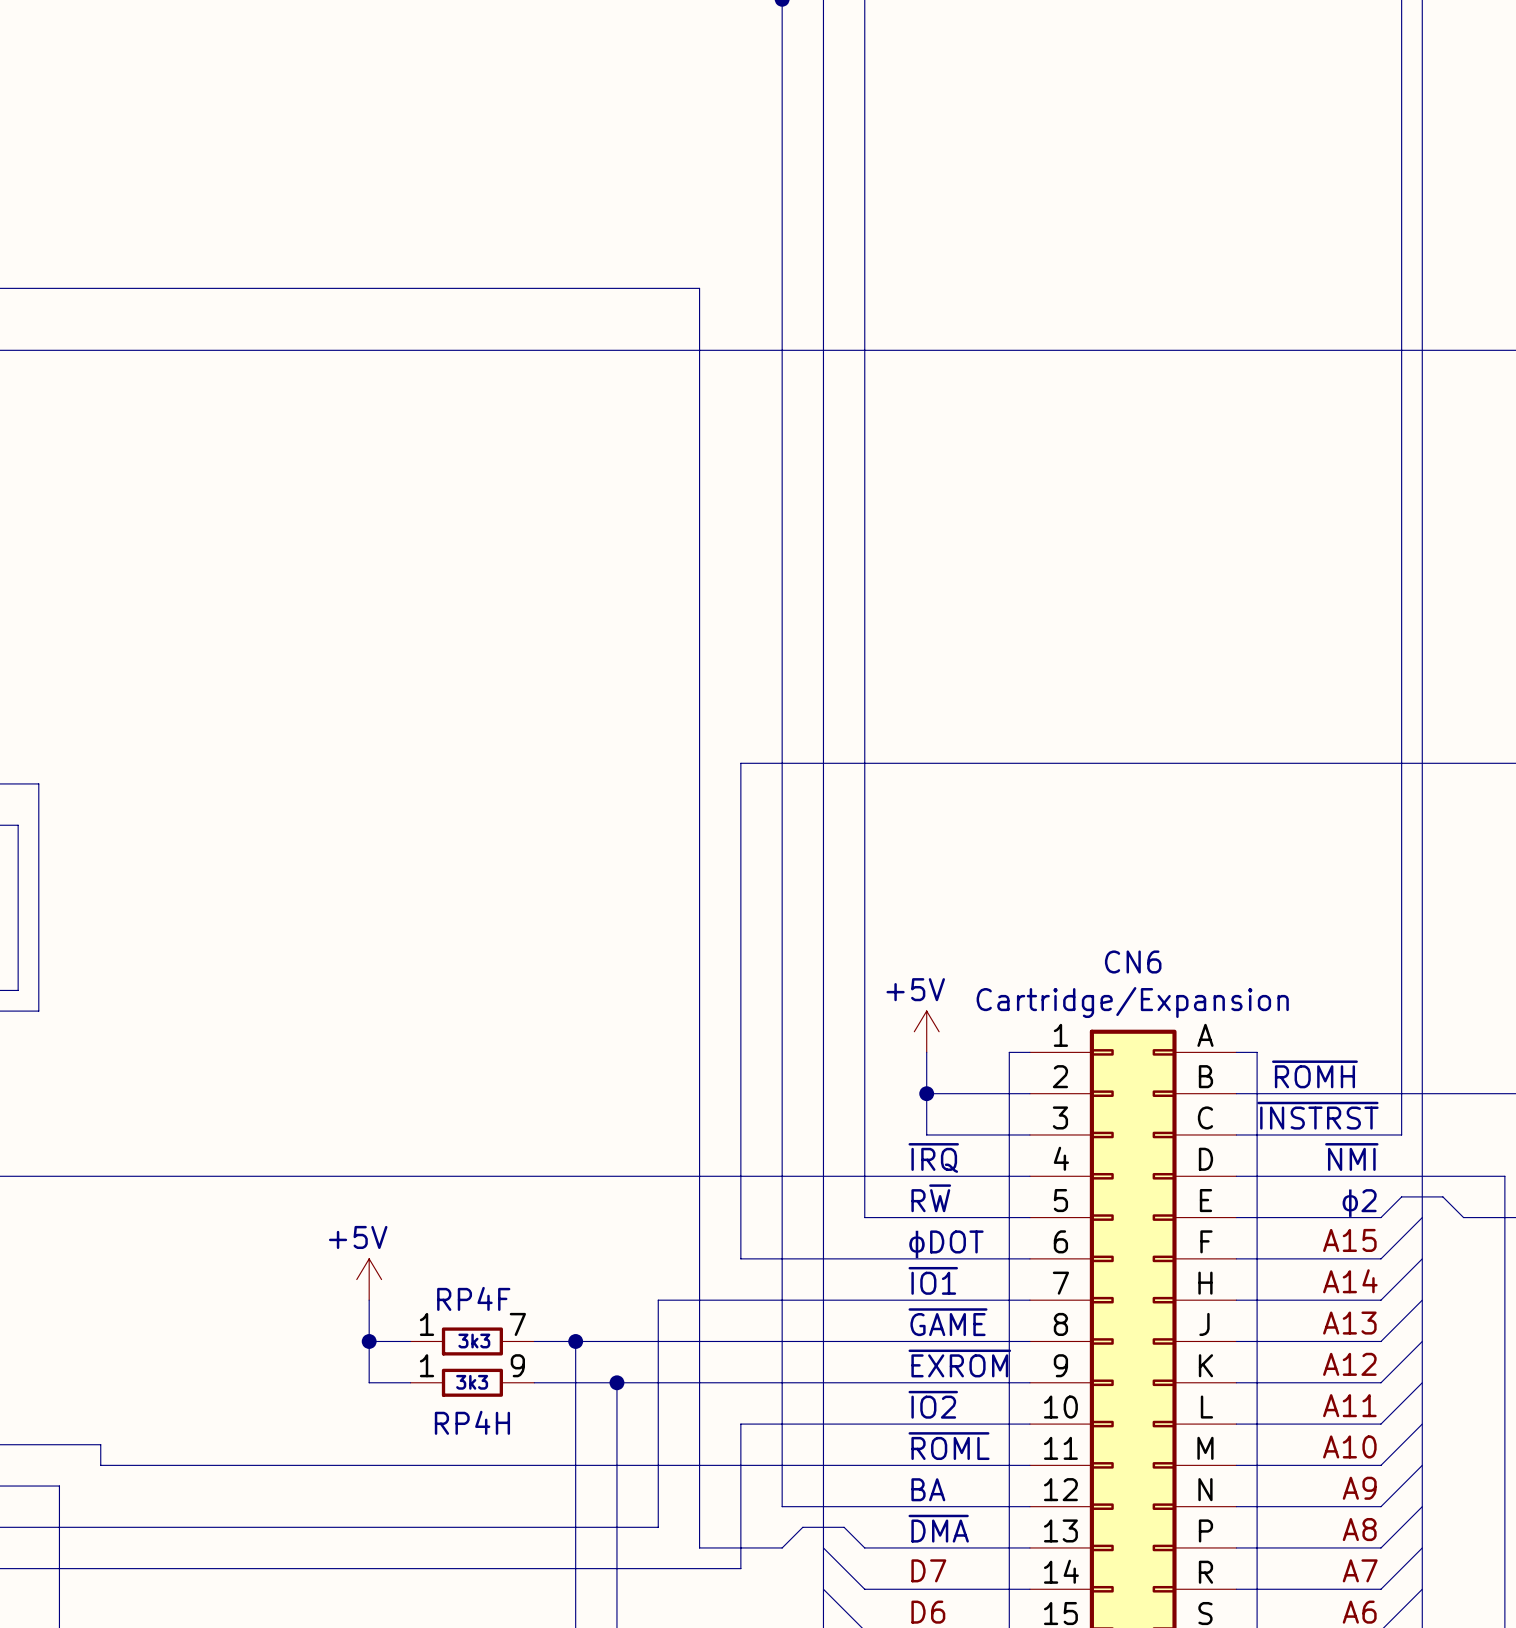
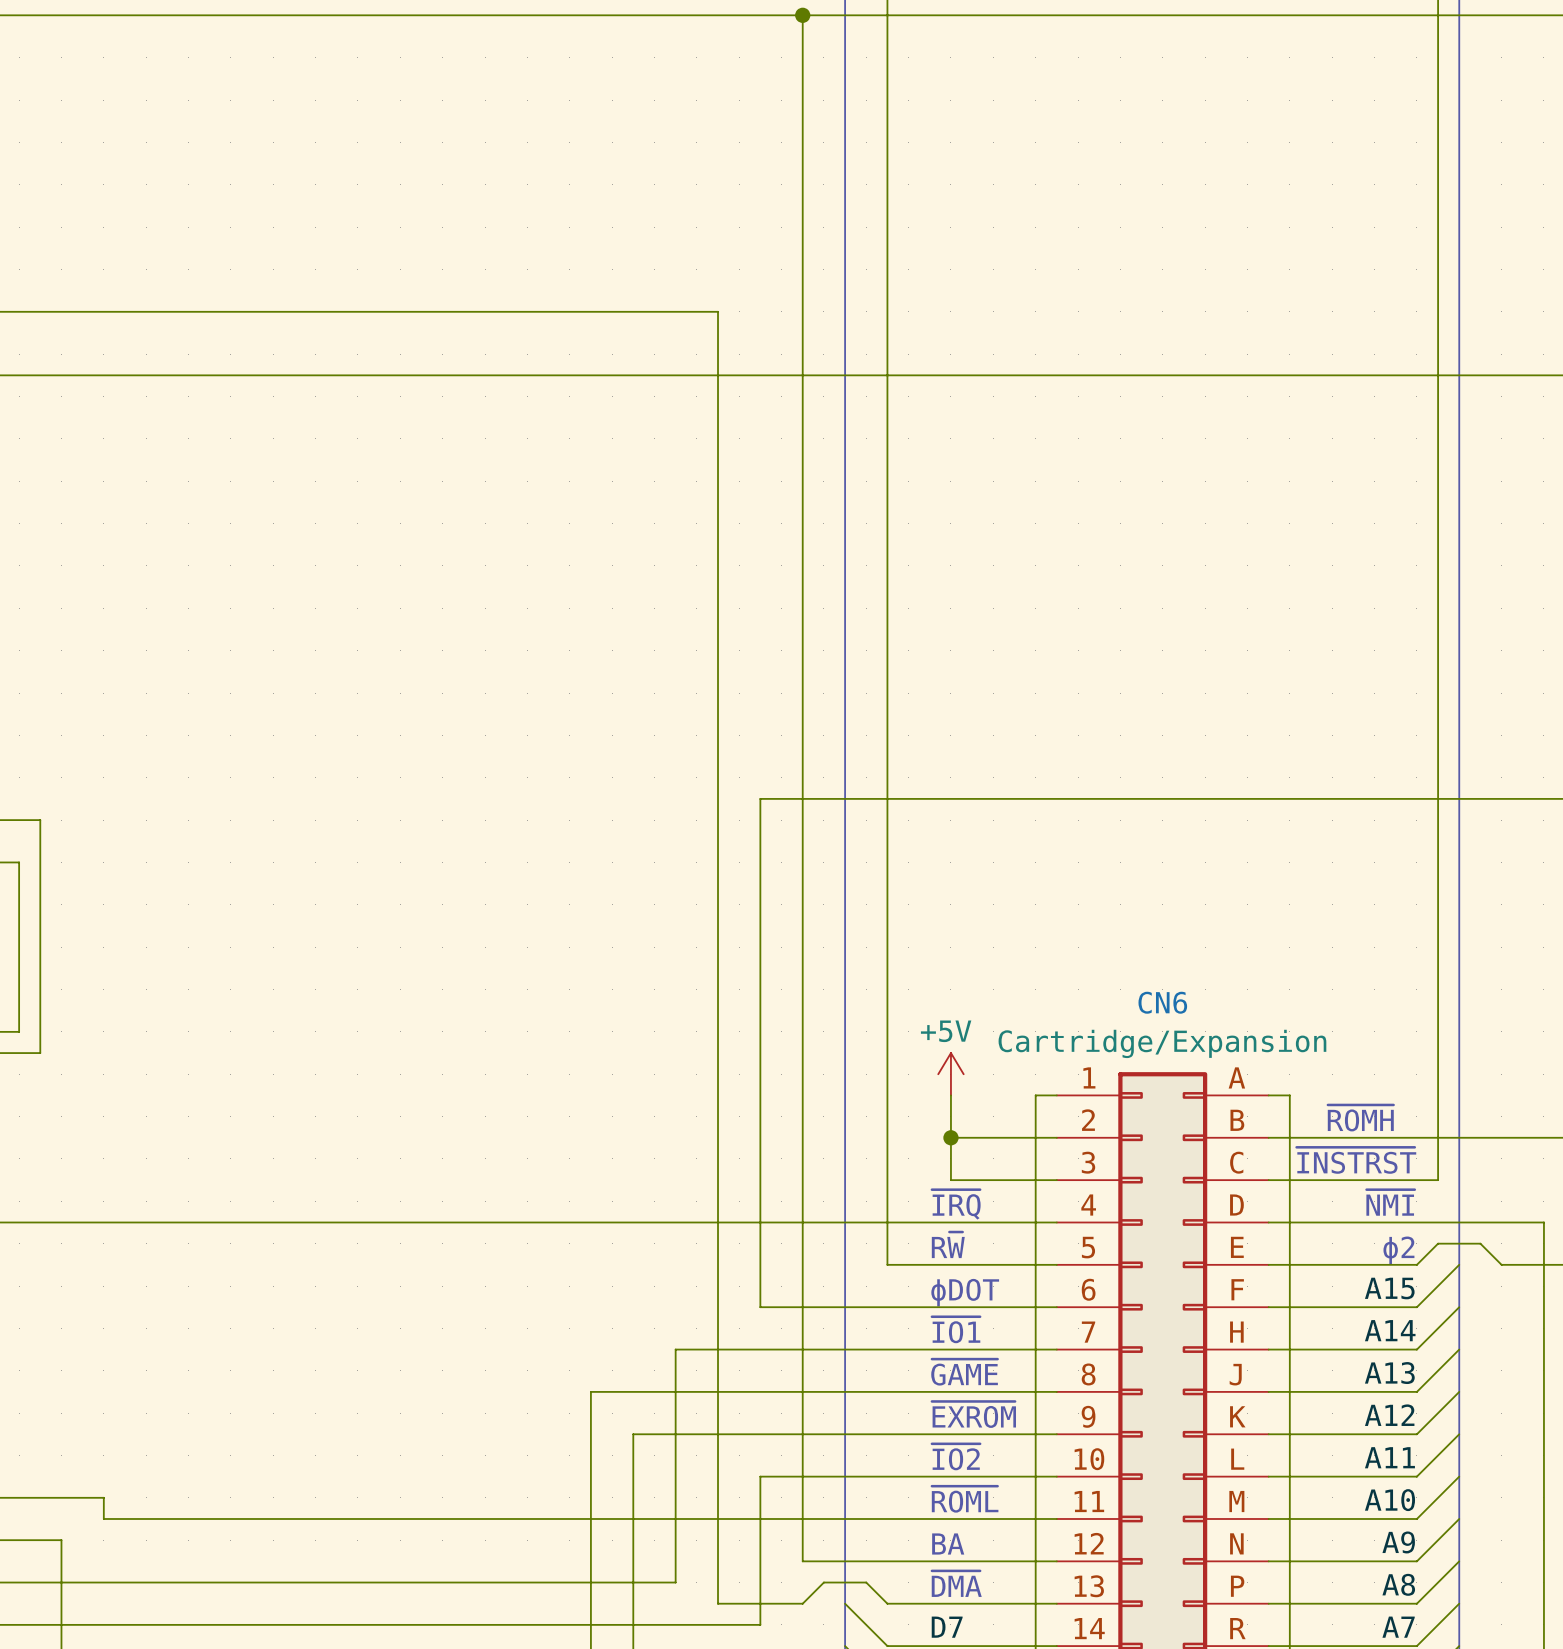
power symbol: +5V (369, 1279) -> none
wire: (369, 1300) (369, 1382) (410, 1382) -> none
wire: (369, 1341) (410, 1341) -> none
junction: (369, 1341) -> none
RP4F: 3k3 (472, 1341) -> none
wire: (534, 1341) (575, 1341) -> none
junction: (575, 1341) -> none
RP4H: 3k3 (472, 1382) -> none
wire: (534, 1382) (616, 1382) -> none
junction: (616, 1382) -> none

